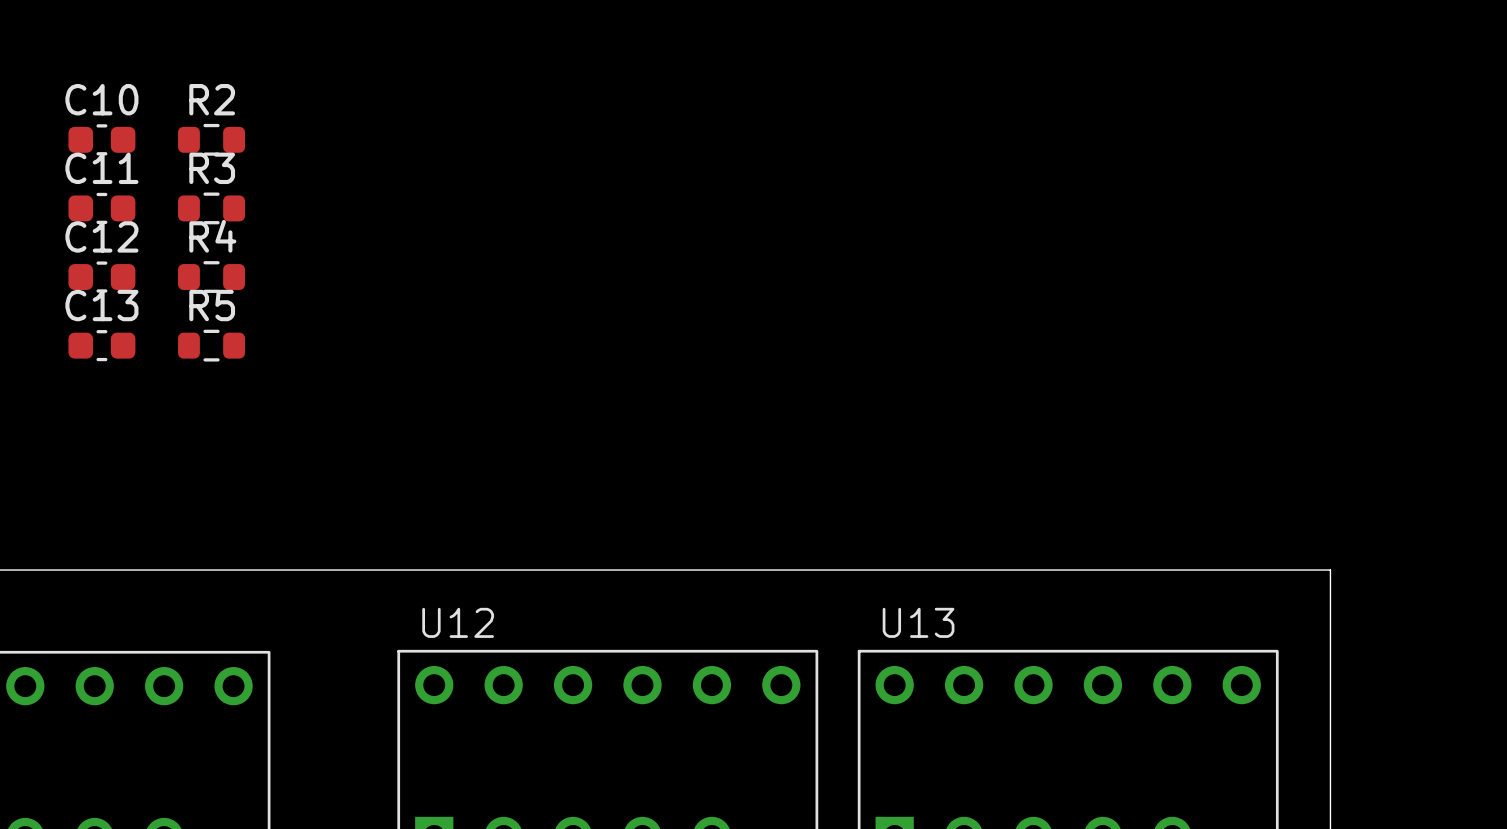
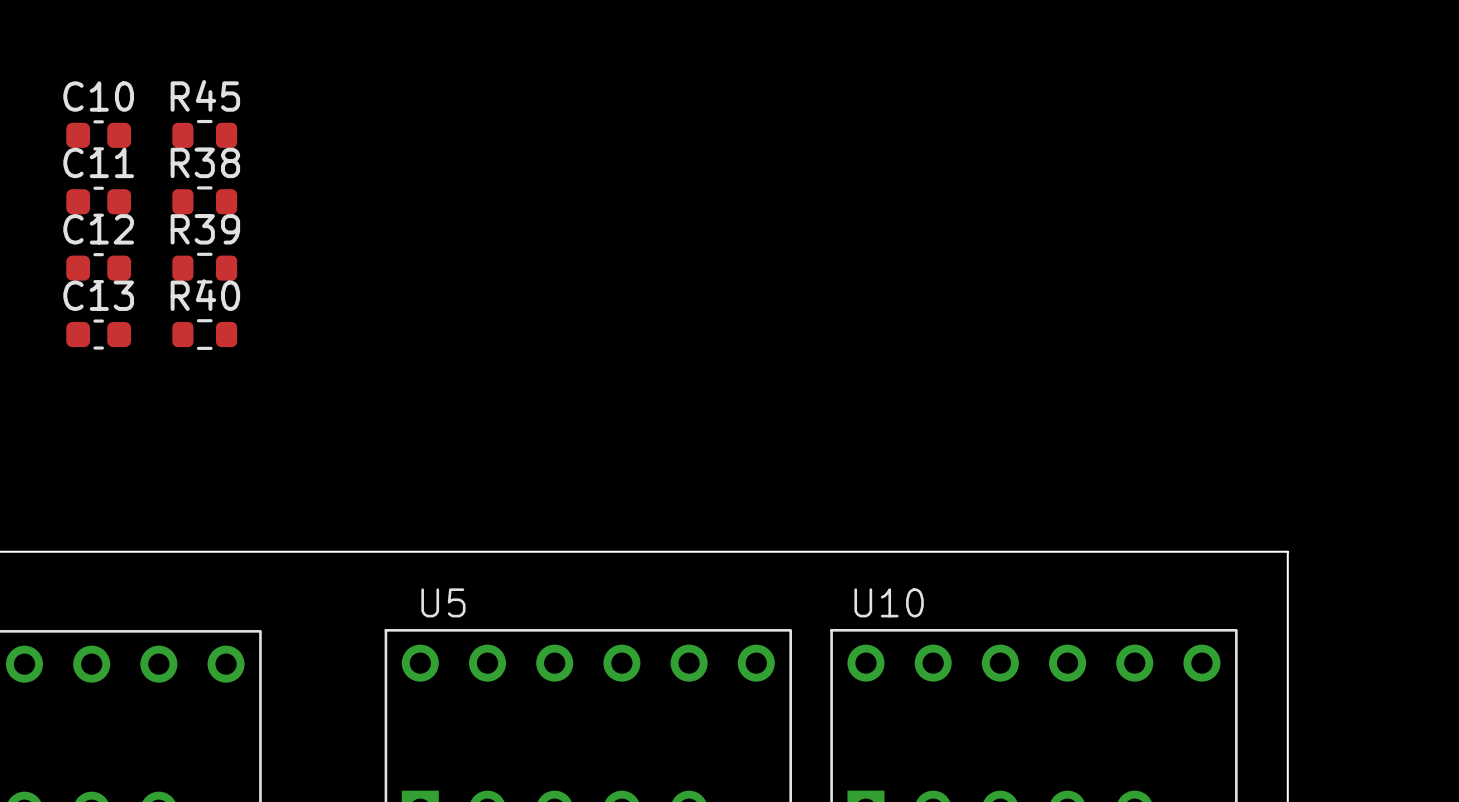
R2 name: R2 (212, 99) -> R45 (205, 95)
R3 name: R3 (212, 168) -> R38 (205, 162)
R4 name: R4 (212, 236) -> R39 (205, 229)
R5 name: R5 (212, 305) -> R40 (205, 295)
U12 name: U12 (458, 622) -> U5 (443, 602)
U13 name: U13 (918, 622) -> U10 (889, 602)

